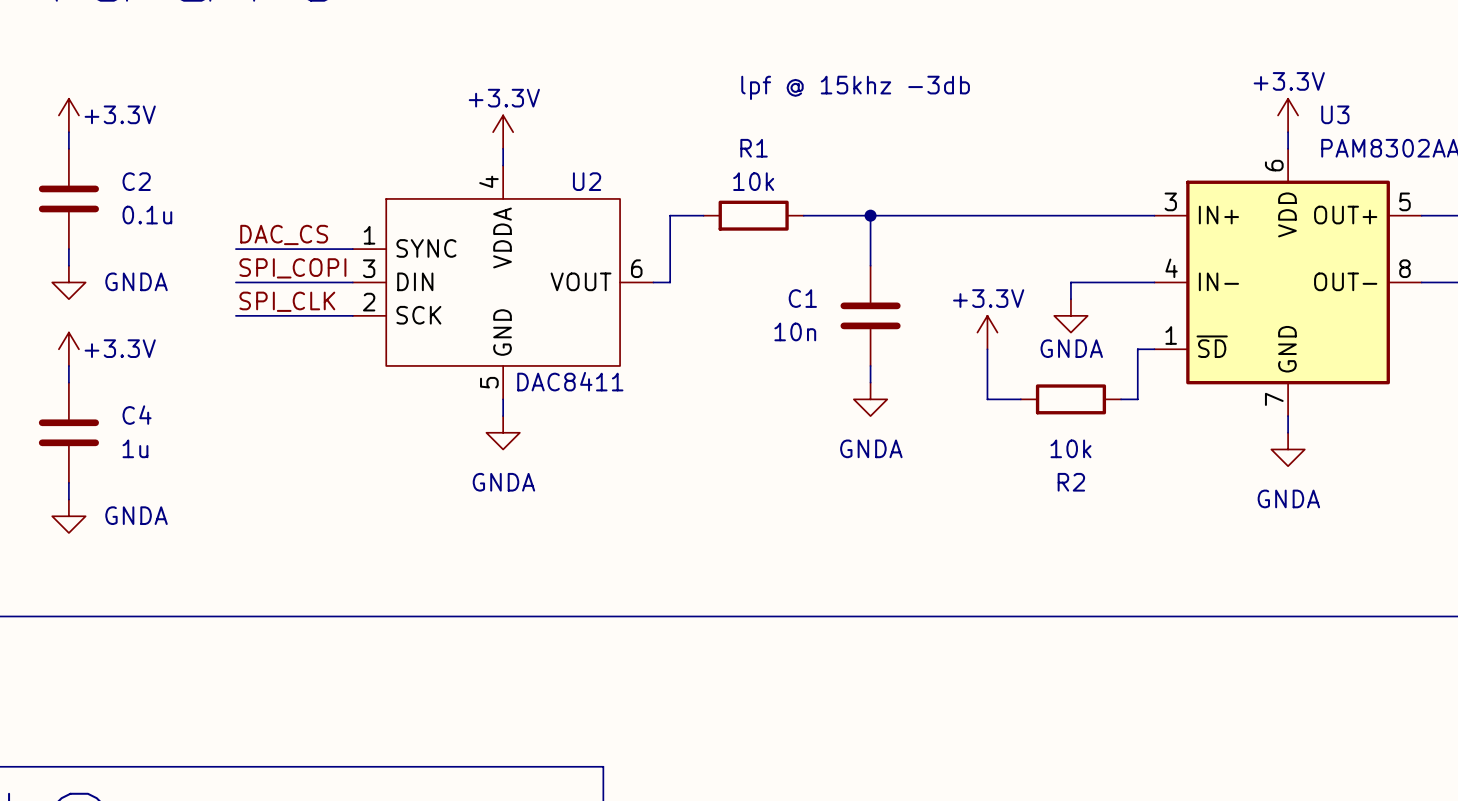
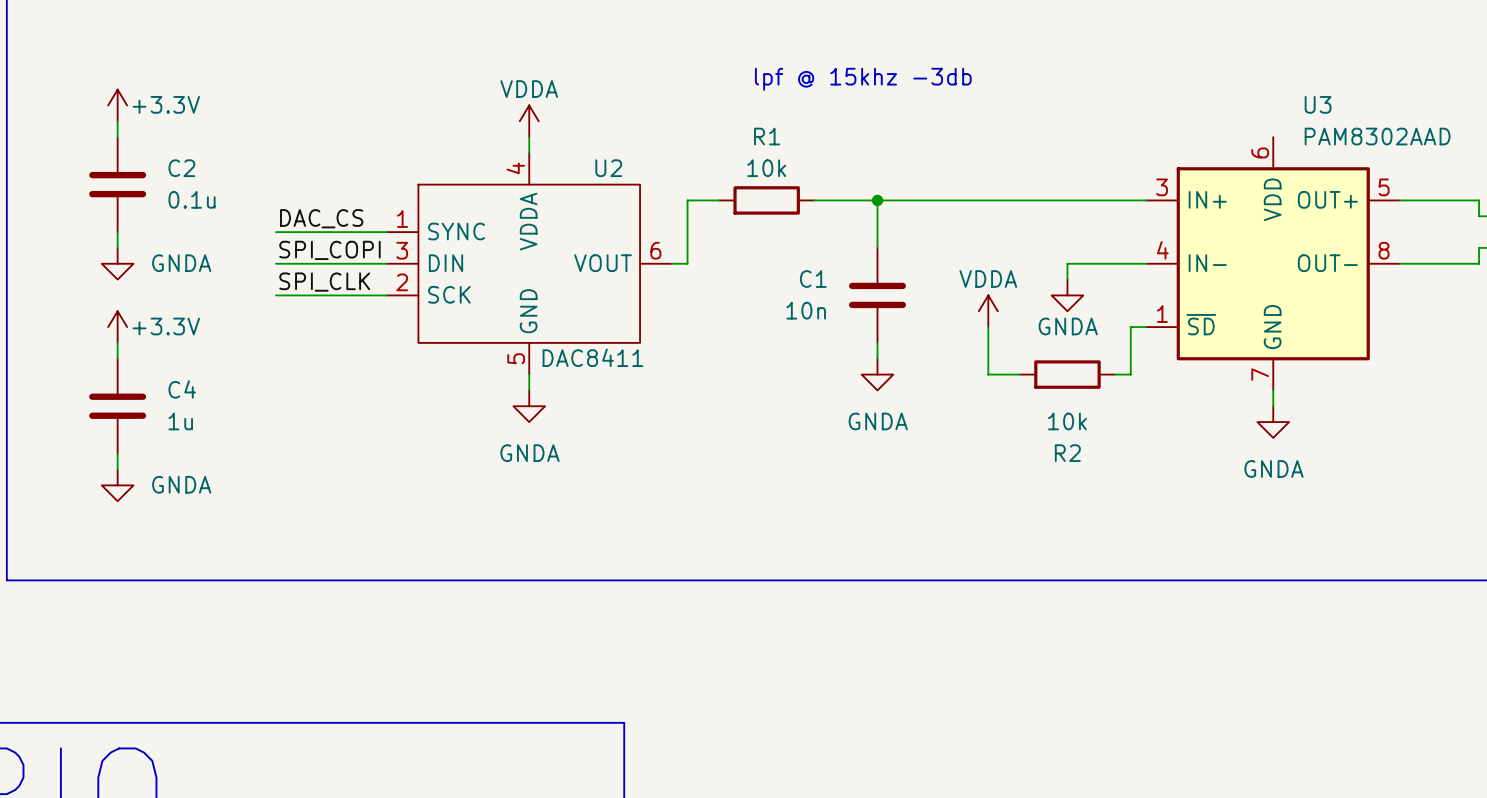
power symbol: +3.3V (1288, 115) -> none
power symbol: +3.3V (503, 132) -> VDDA (529, 121)
wire: (1288, 132) (1288, 148) -> none
power symbol: +3.3V (987, 332) -> VDDA (988, 311)

